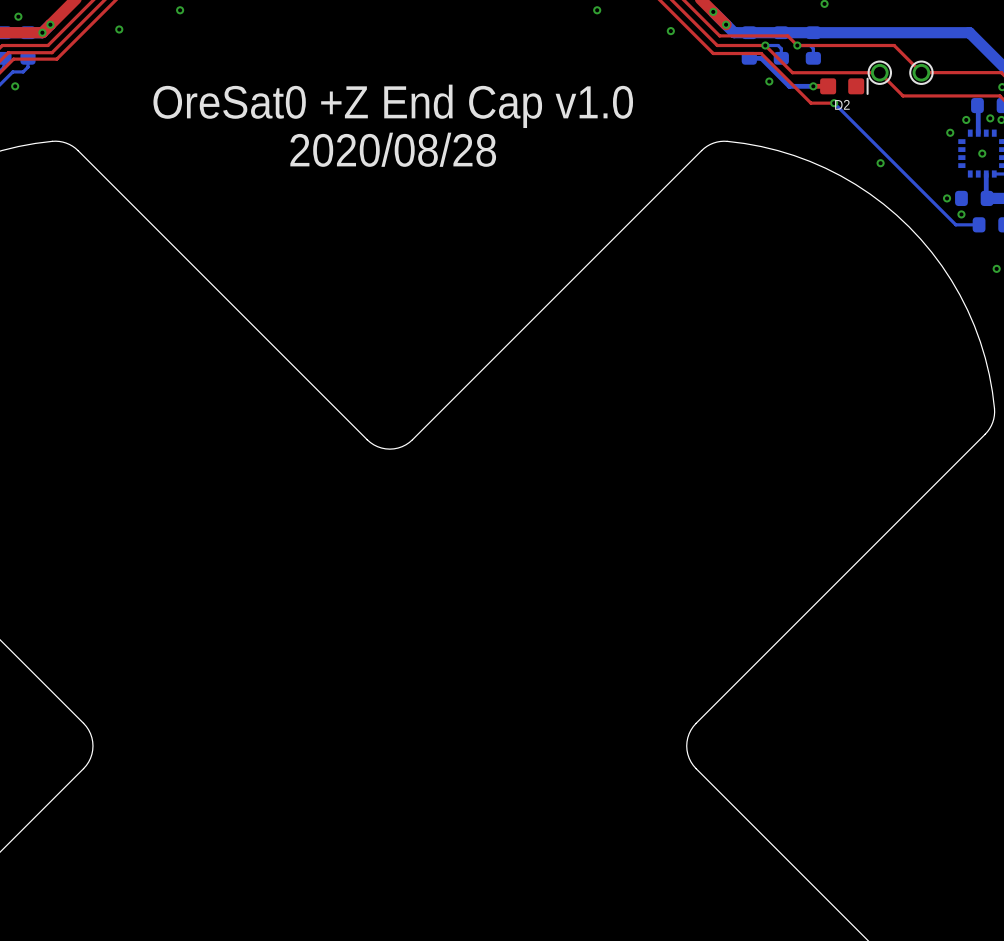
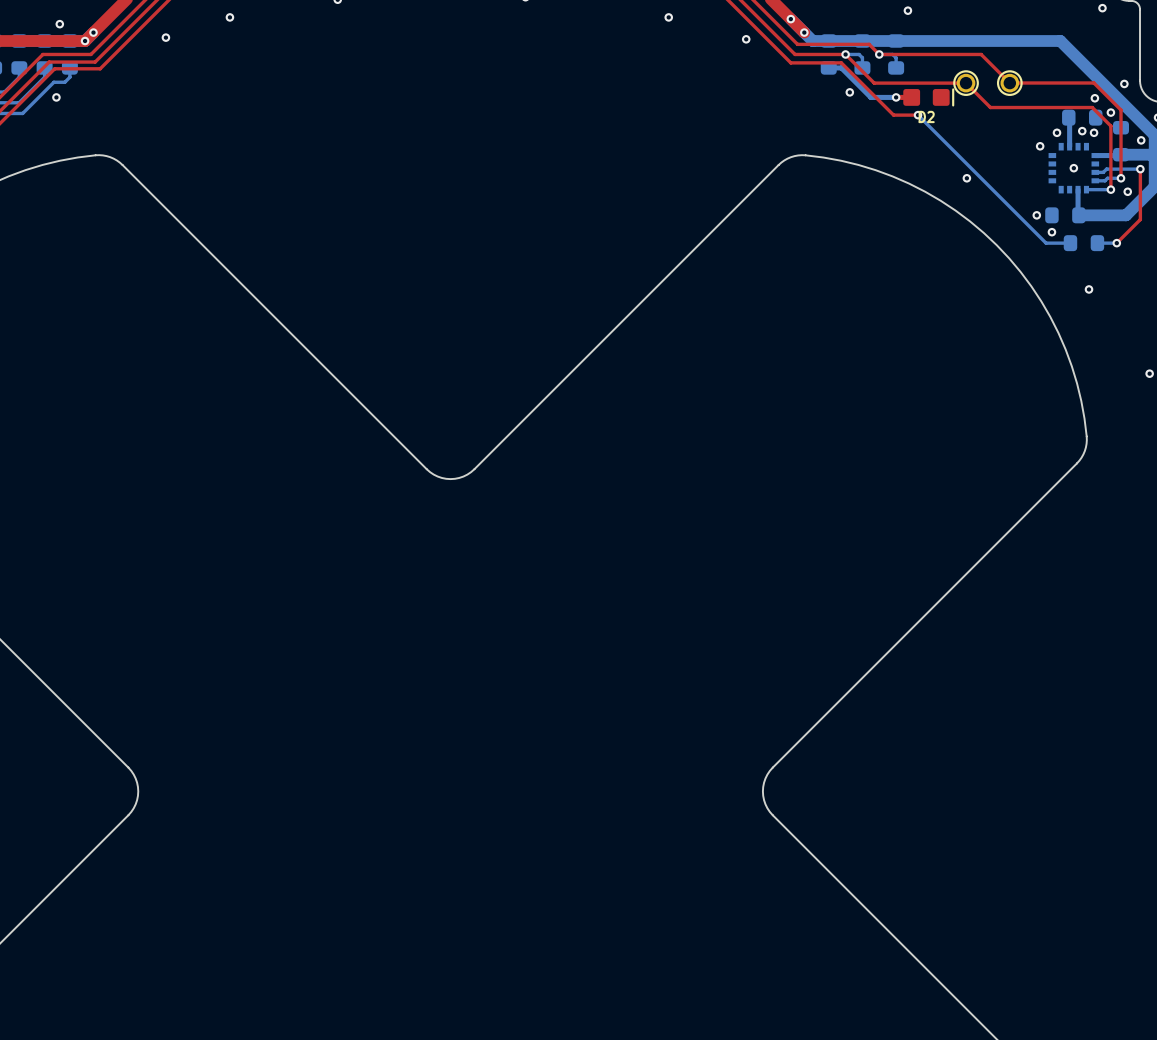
text: OreSat0 +Z End Cap v1.0 (393, 106) -> none
text: 2020/08/28 (393, 149) -> none

